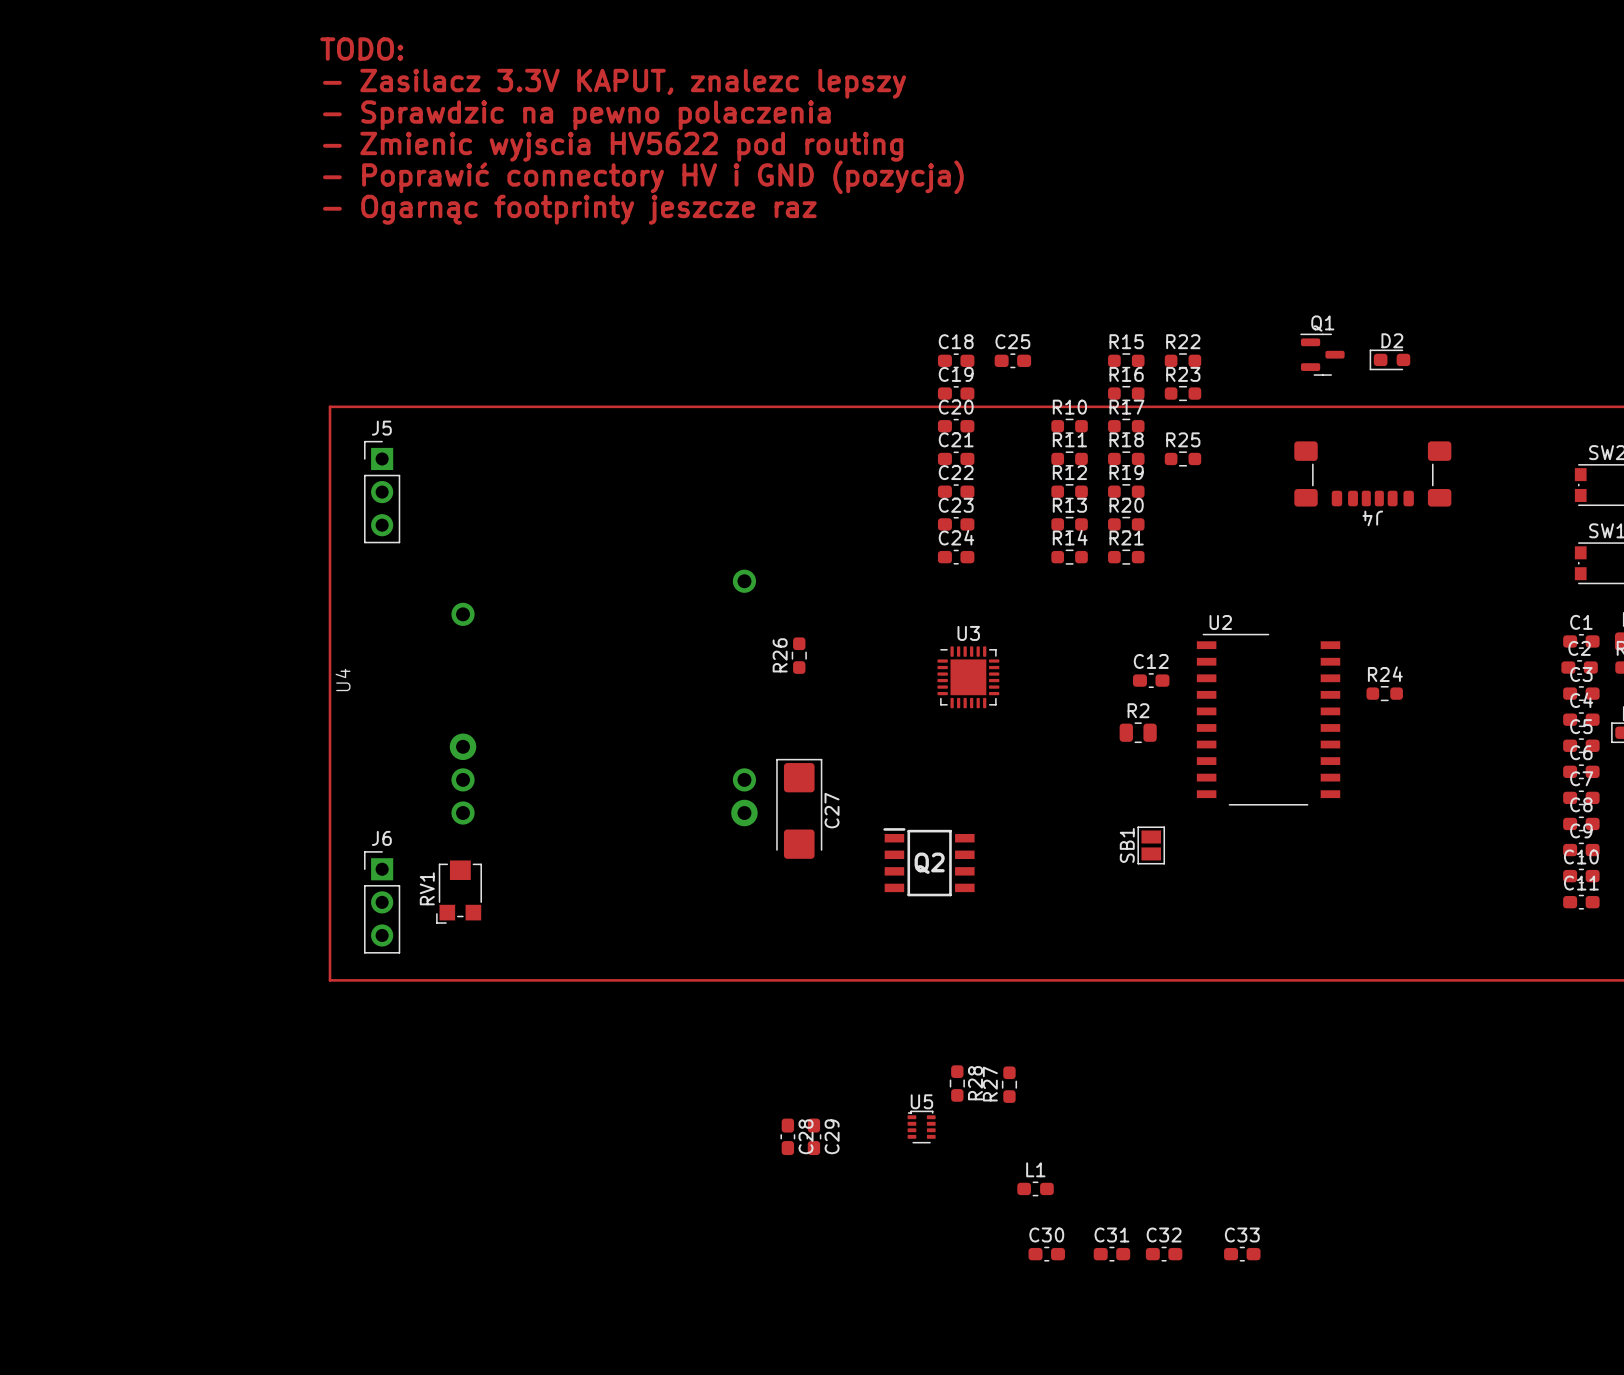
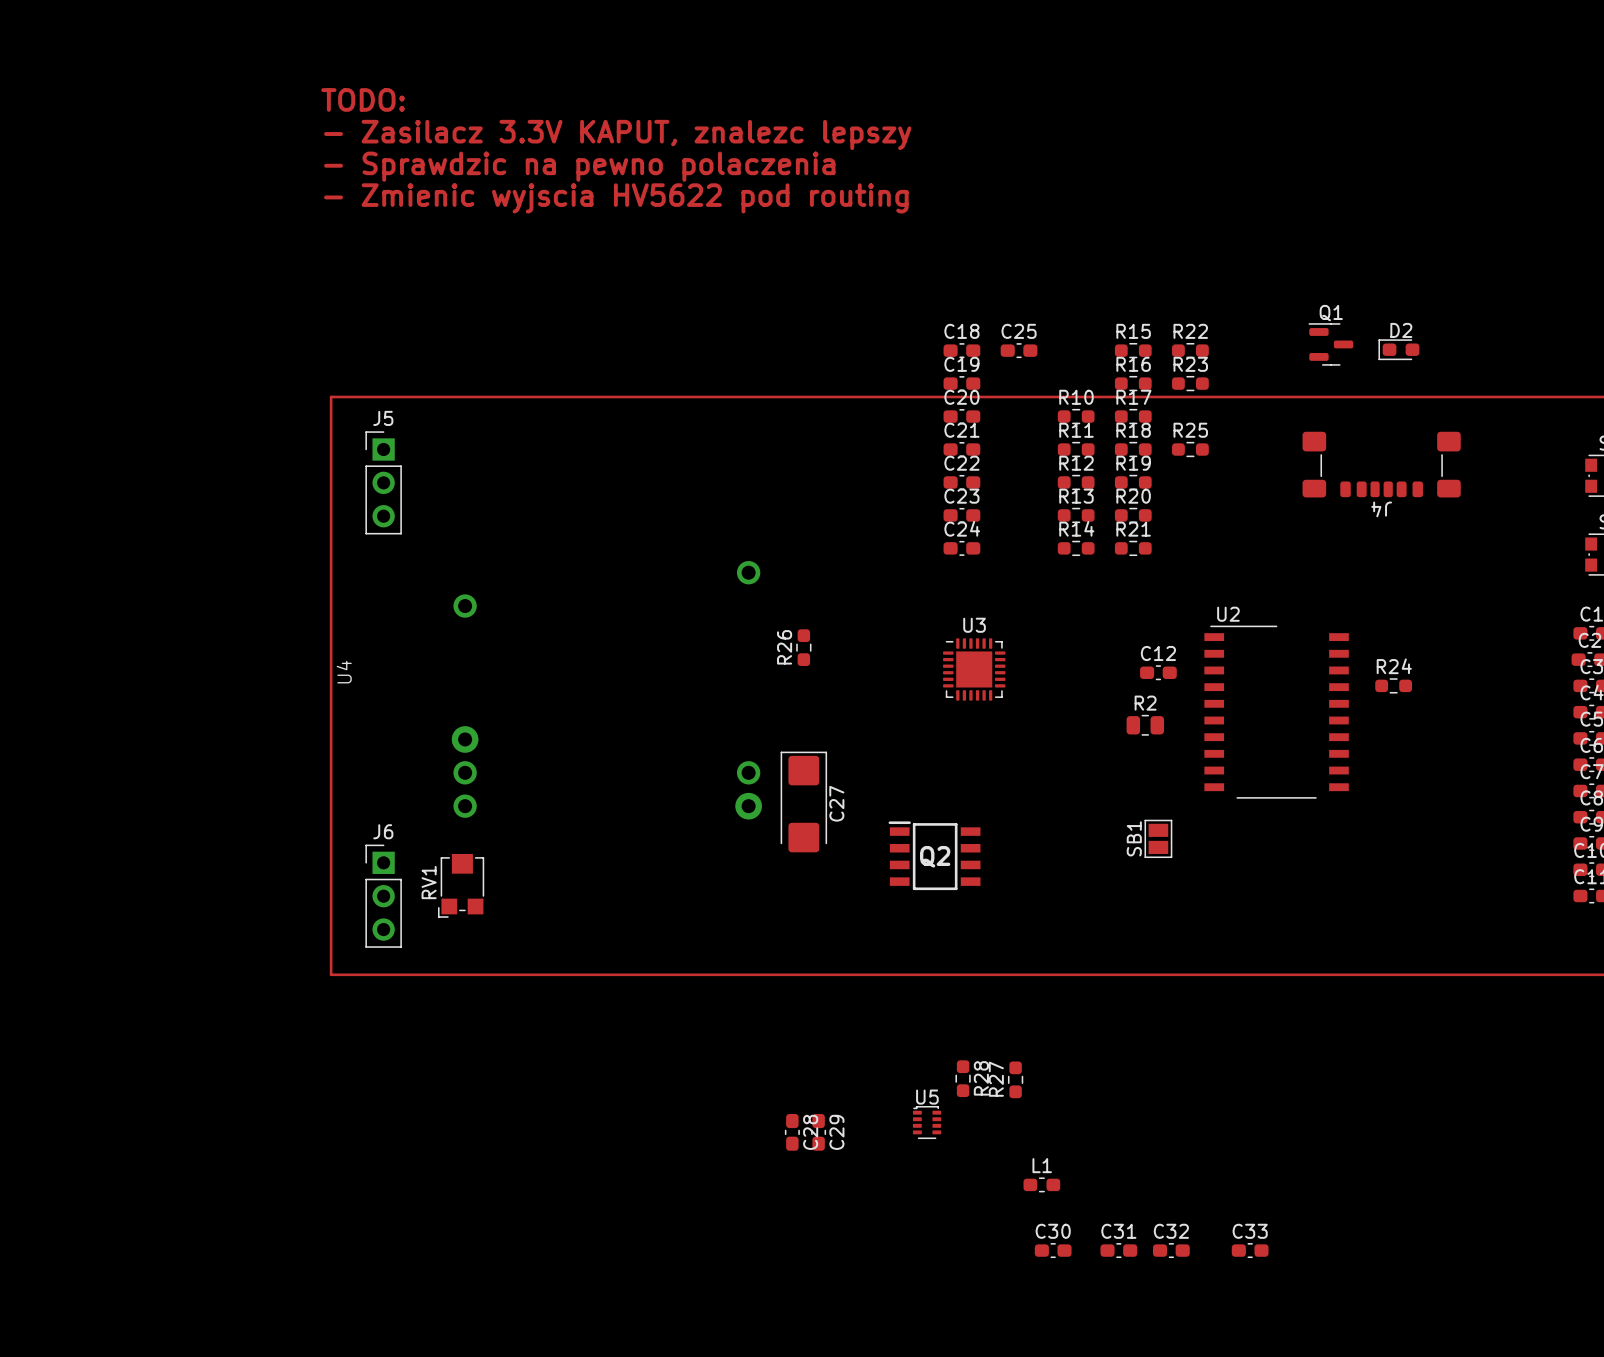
text: TODO: (361, 49) -> none
text: - Zasilacz 3.3V KAPUT, znalezc lepszy (614, 83) -> none
text: - Sprawdzic na pewno polaczenia (576, 115) -> TODO: (363, 99)
text: - Zmienic wyjscia HV5622 pod routing (613, 146) -> - Zasilacz 3.3V KAPUT, znalezc lepszy (617, 134)
text: - Poprawić connectory HV i GND (pozycja) (643, 177) -> - Sprawdzic na pewno polaczenia (579, 166)
text: - Ogarnąc footprinty jeszcze raz (569, 209) -> - Zmienic wyjscia HV5622 pod routing (616, 198)

